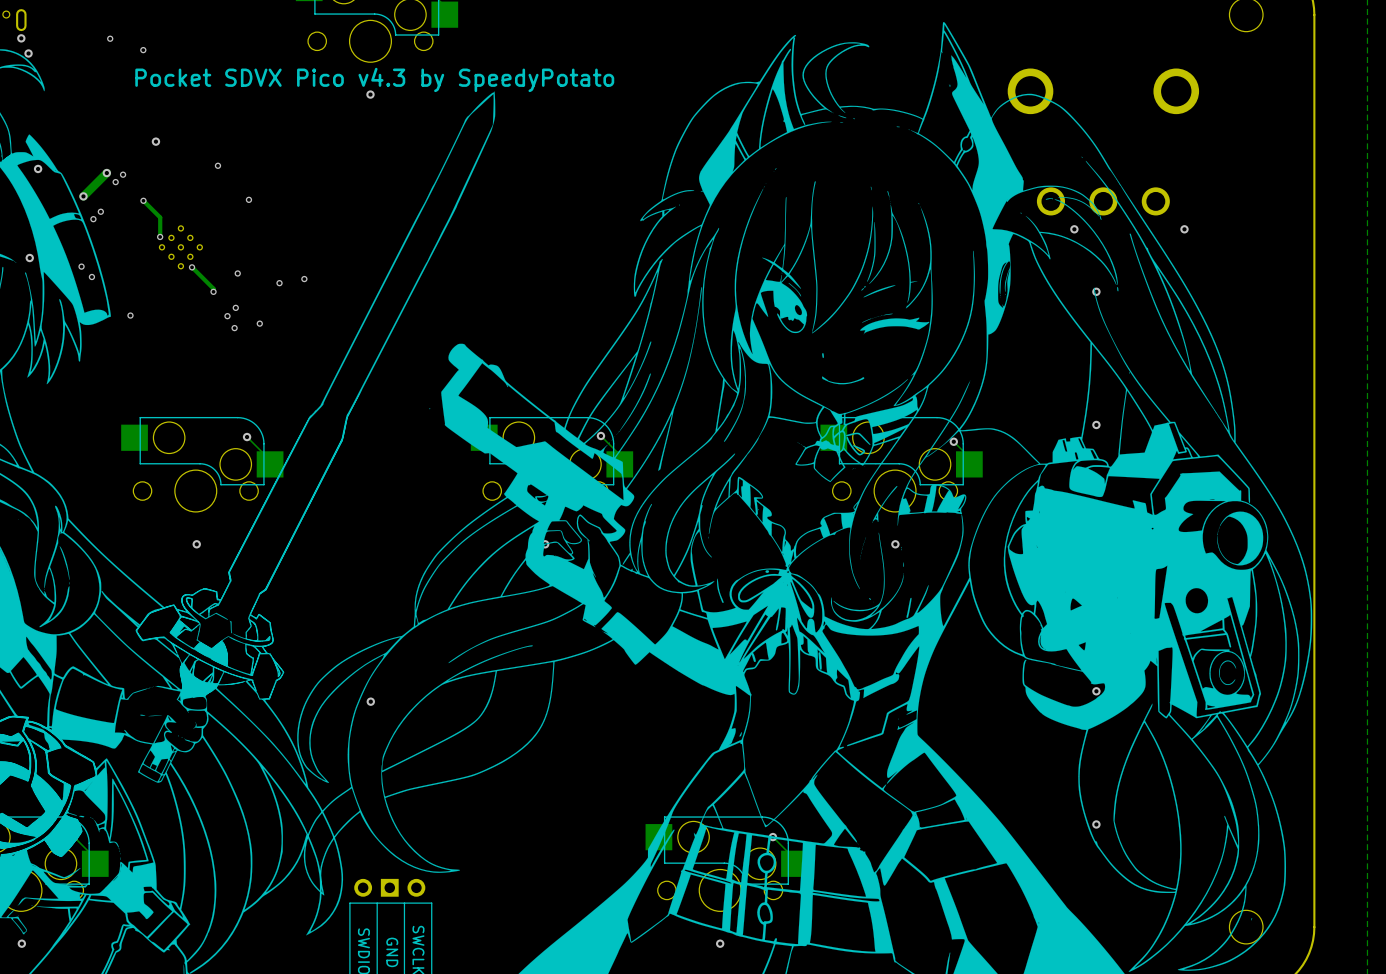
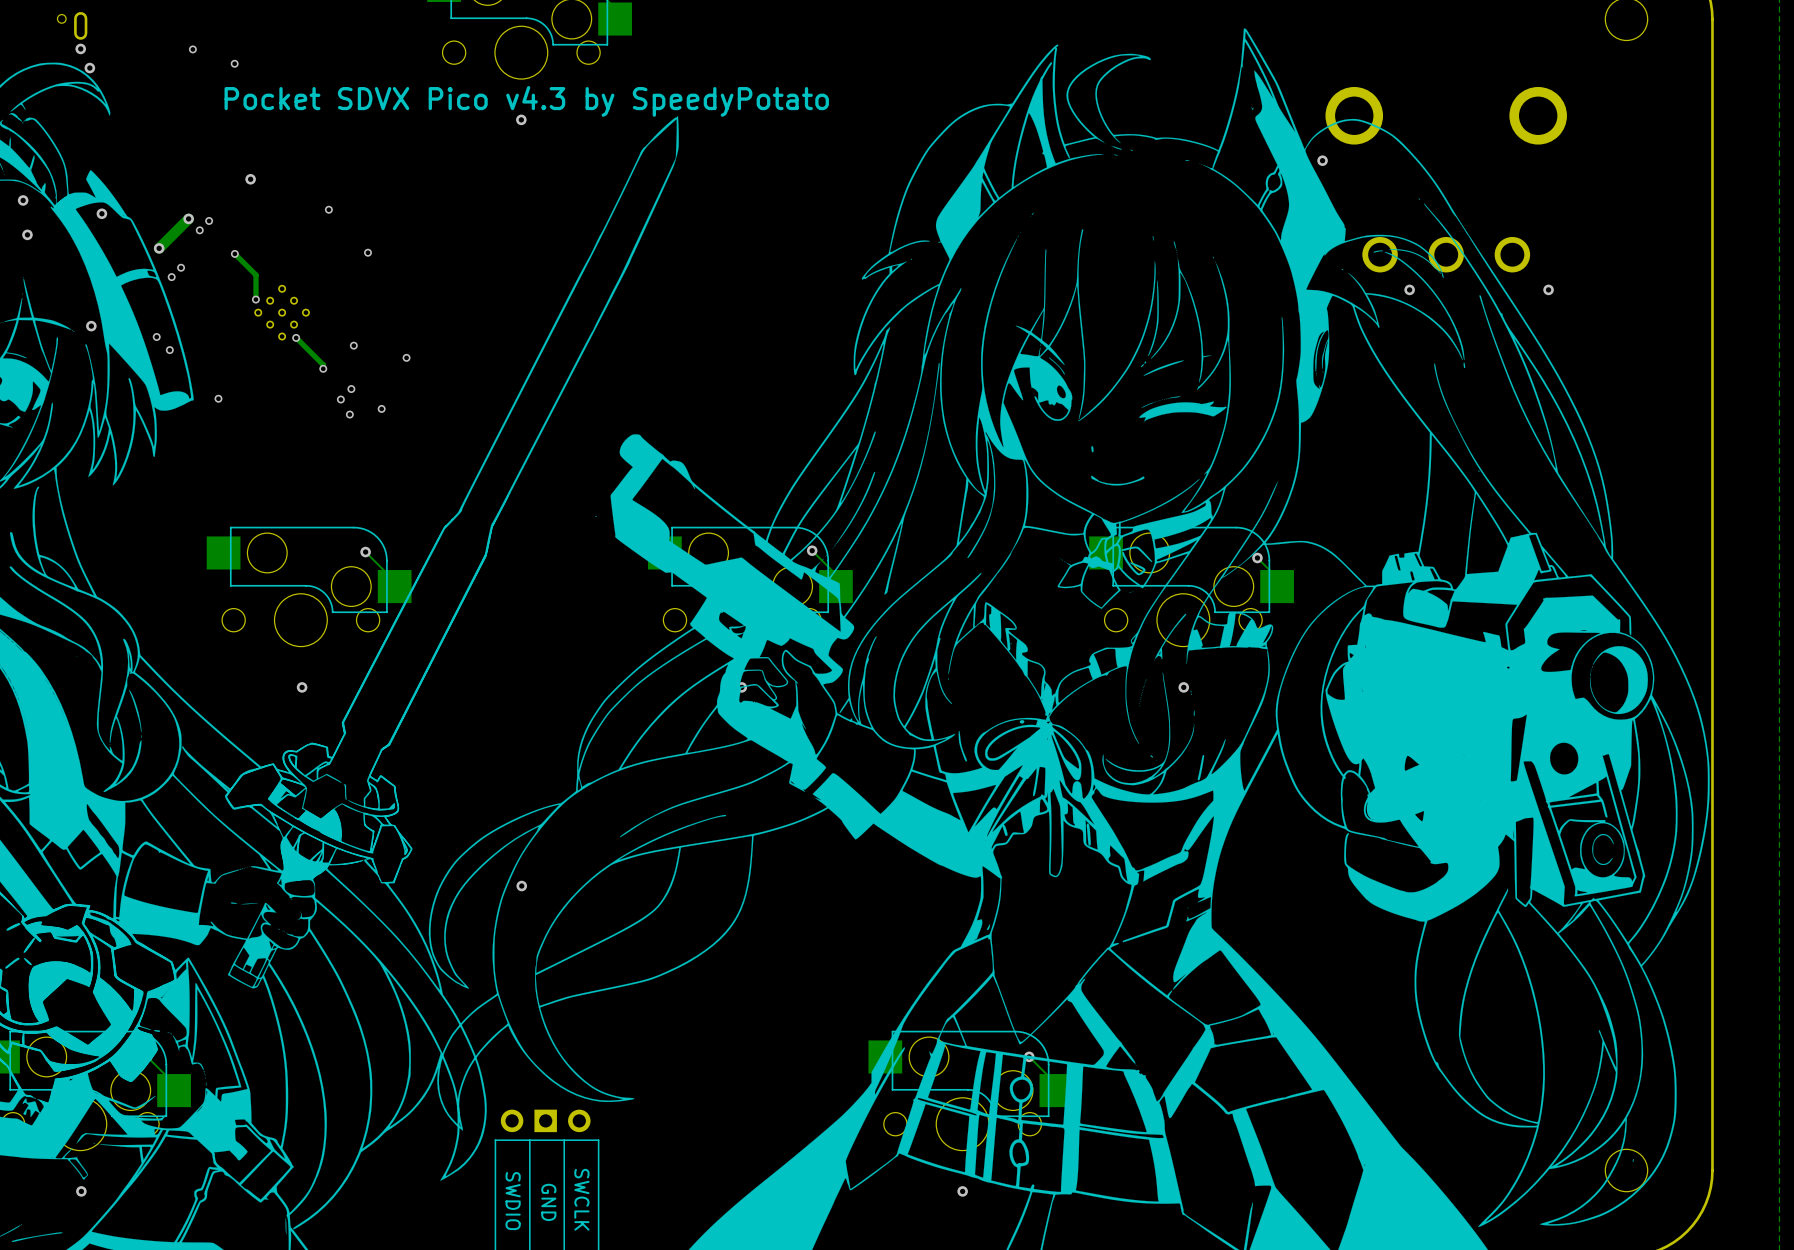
via: none -> (1322, 160)
via: (304, 279) -> none
via: (1096, 291) -> none
via: (1096, 424) -> none
via: (1096, 691) -> none
via: (1096, 824) -> none

